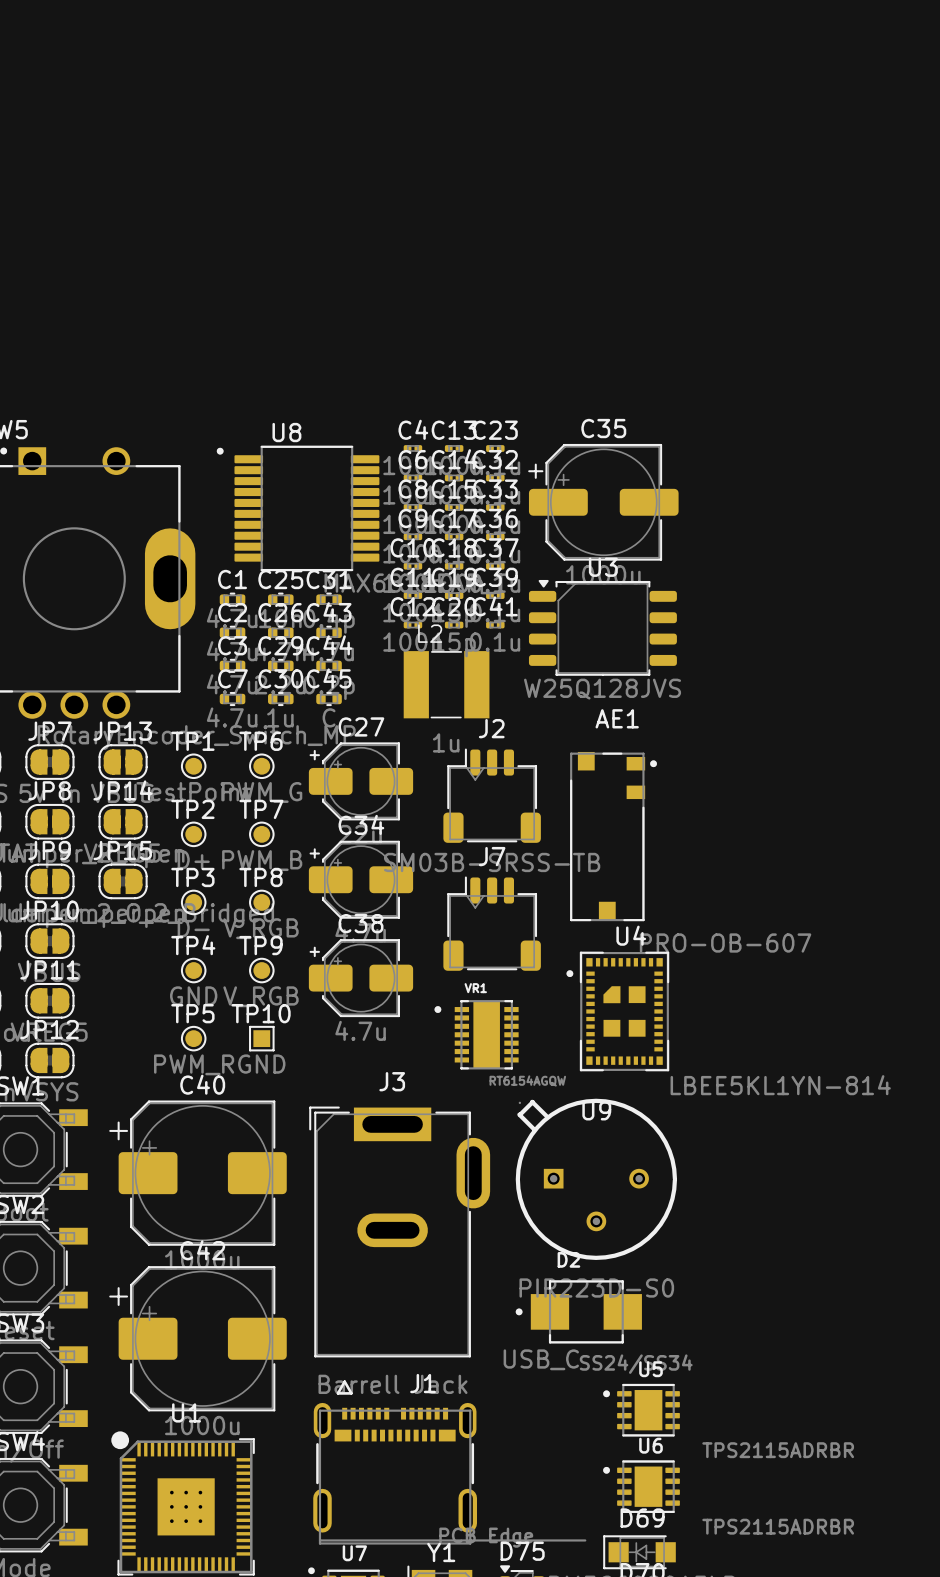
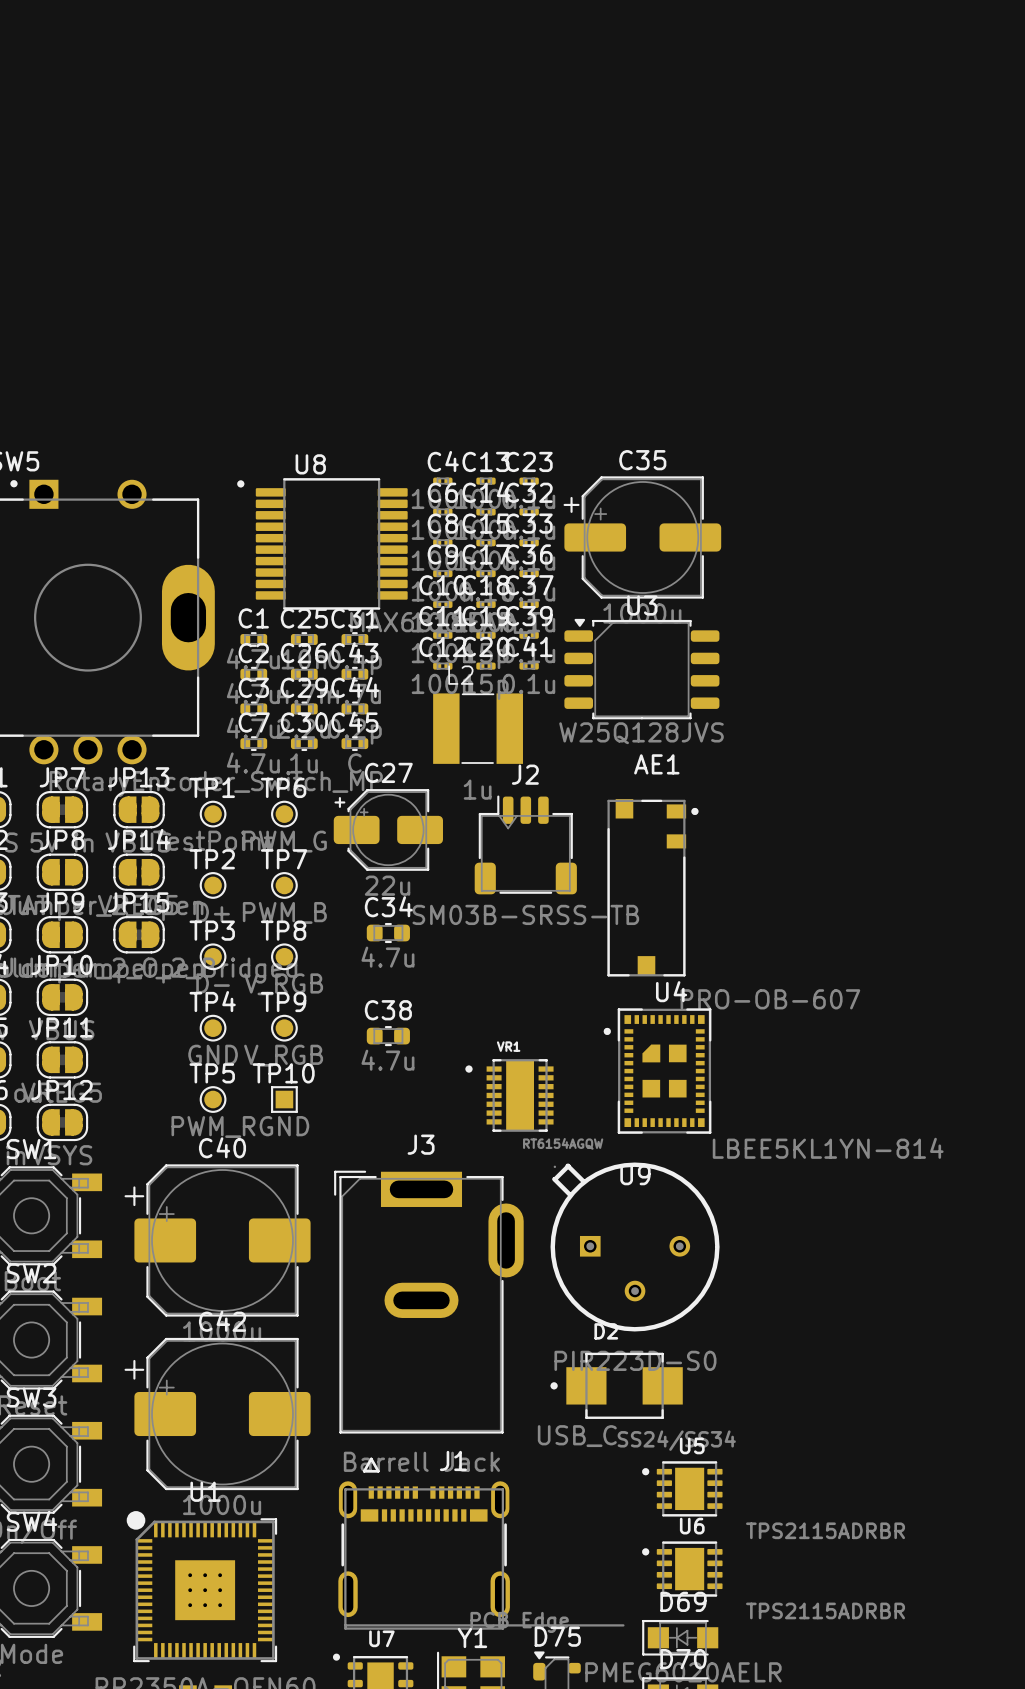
C34 footprint: [308, 840, 414, 919] -> [366, 922, 410, 944]
J7: (492, 923) -> none
C38 footprint: [308, 939, 414, 1018] -> [366, 1026, 410, 1047]

